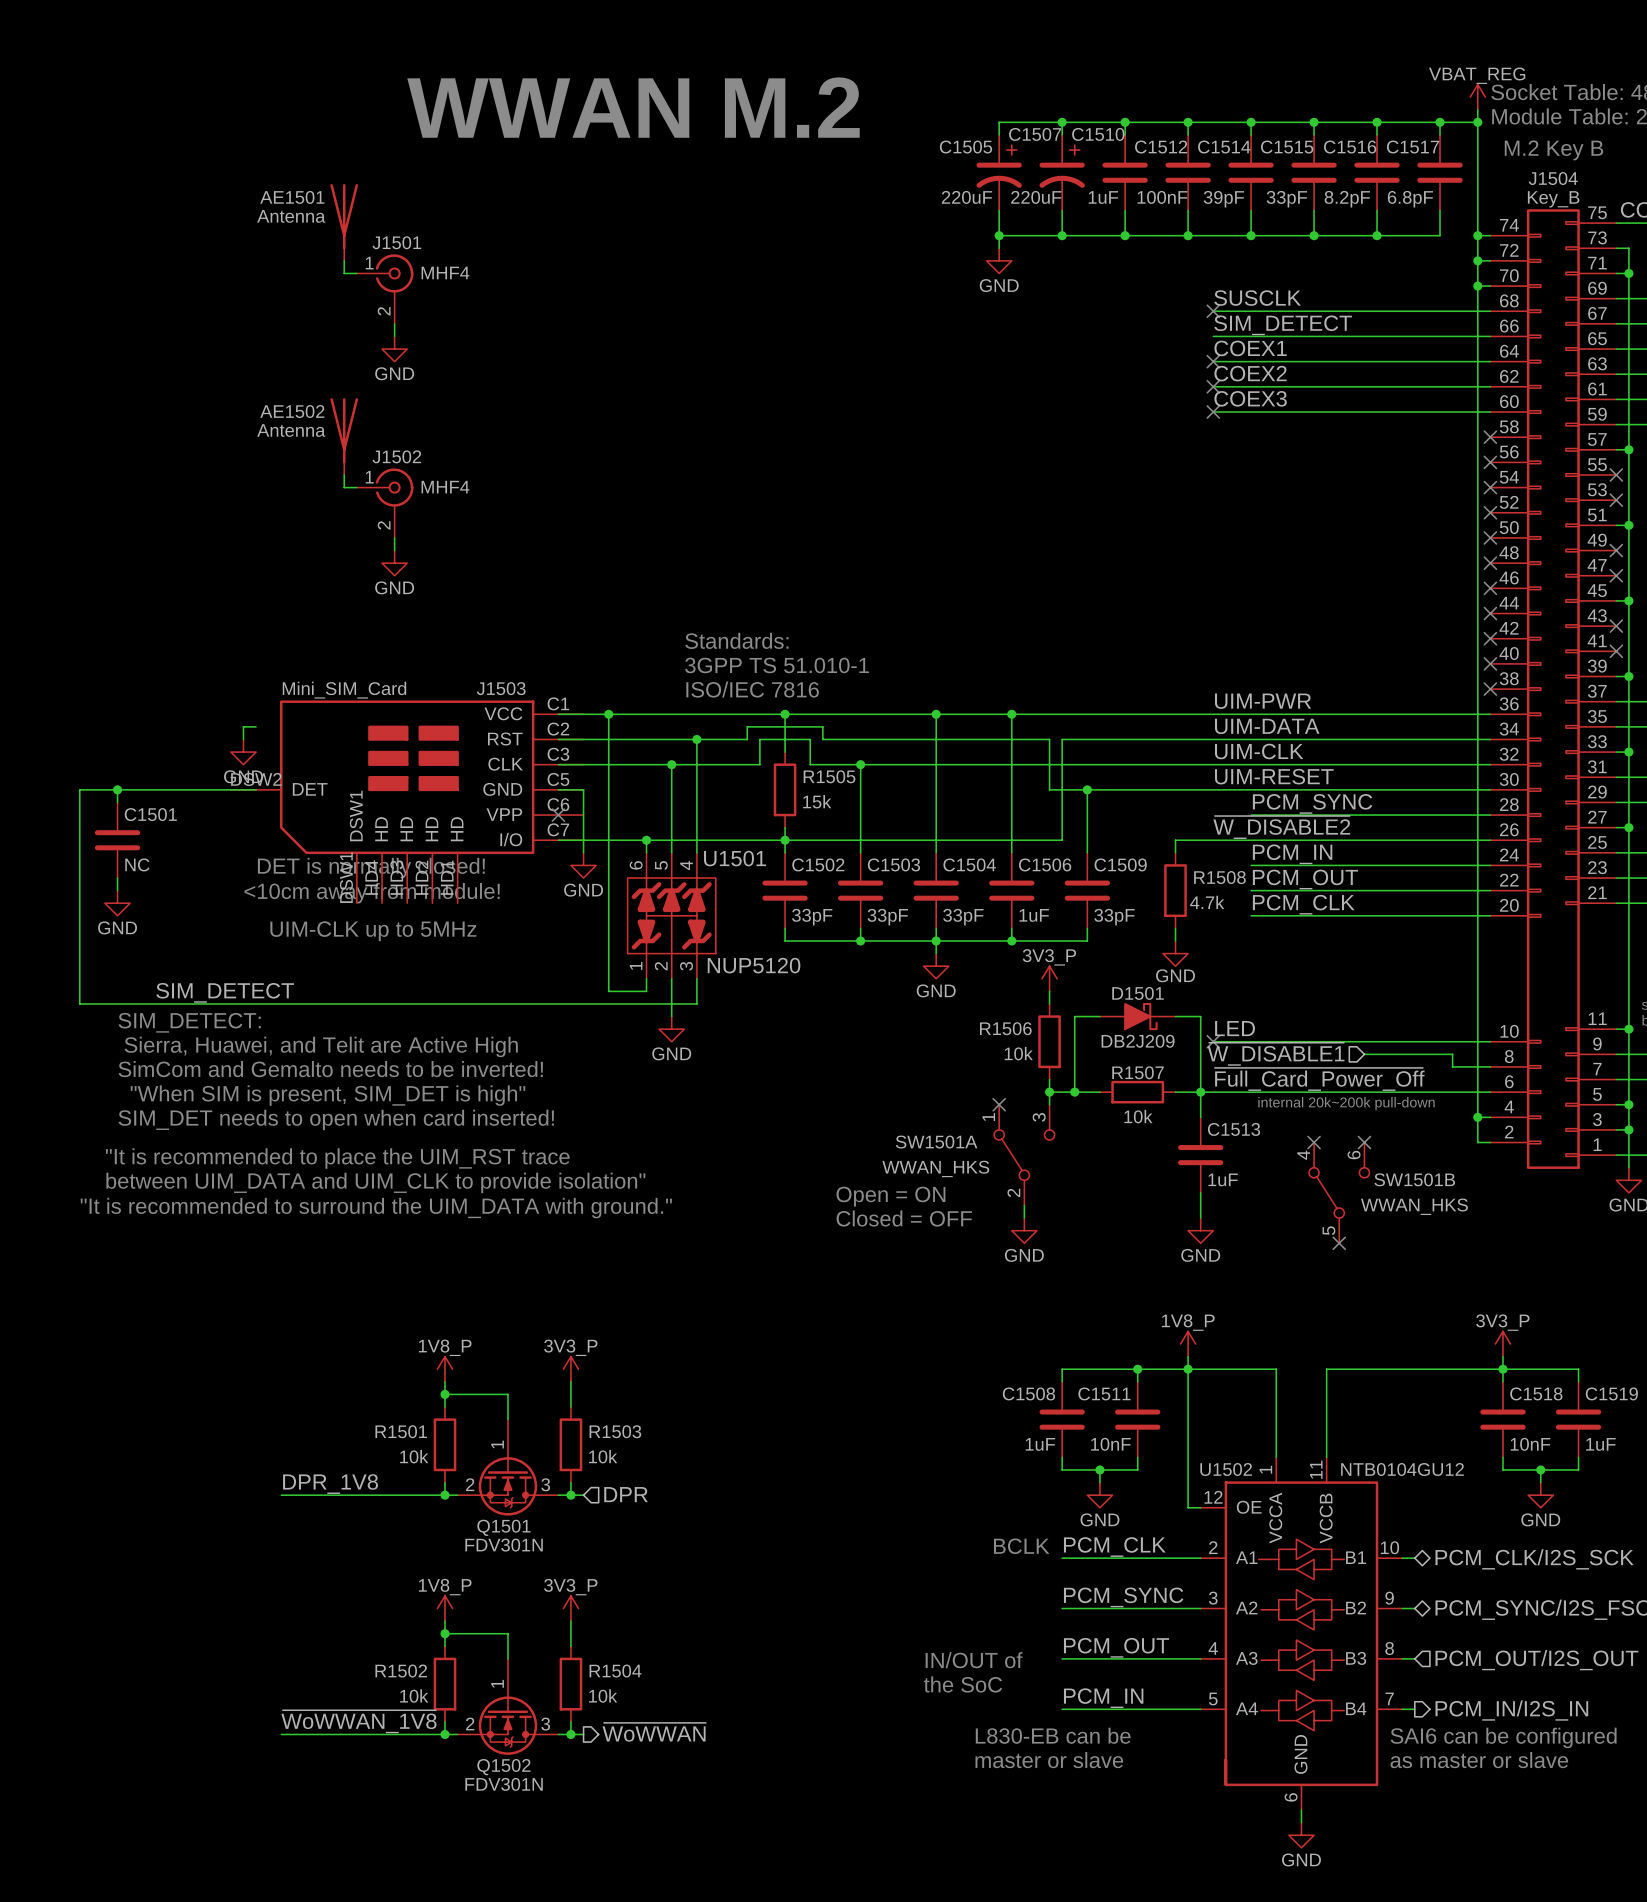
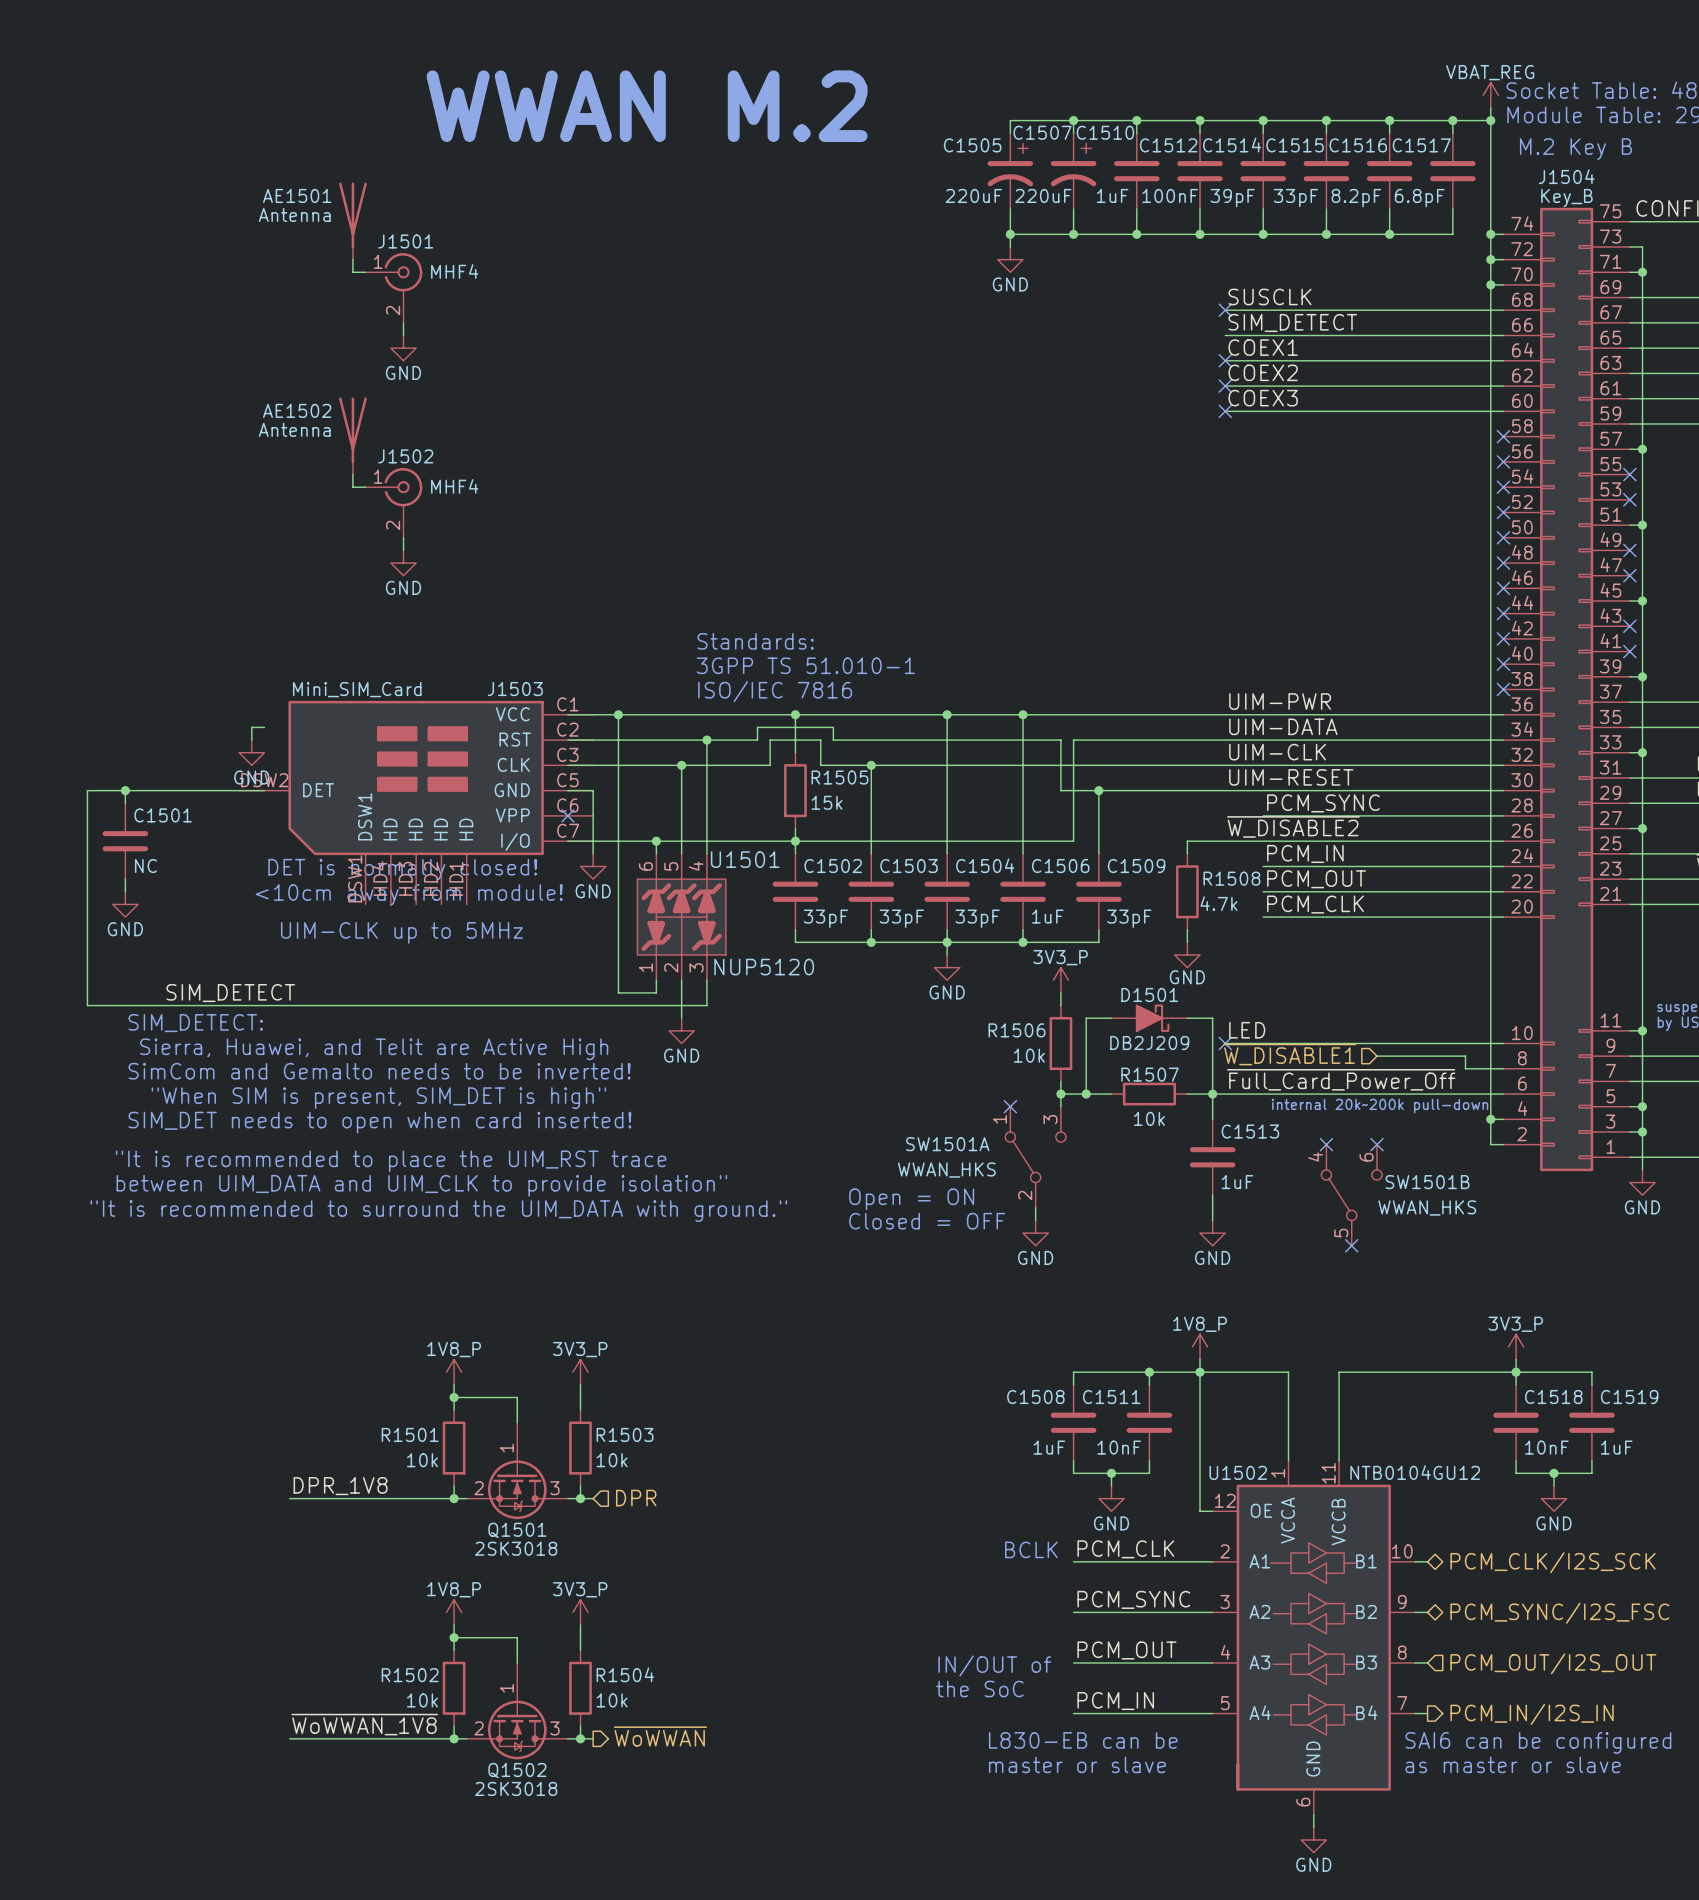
Q1501 value: FDV301N (504, 1545) -> 2SK3018 (516, 1548)
Q1502 value: FDV301N (504, 1784) -> 2SK3018 (516, 1788)

